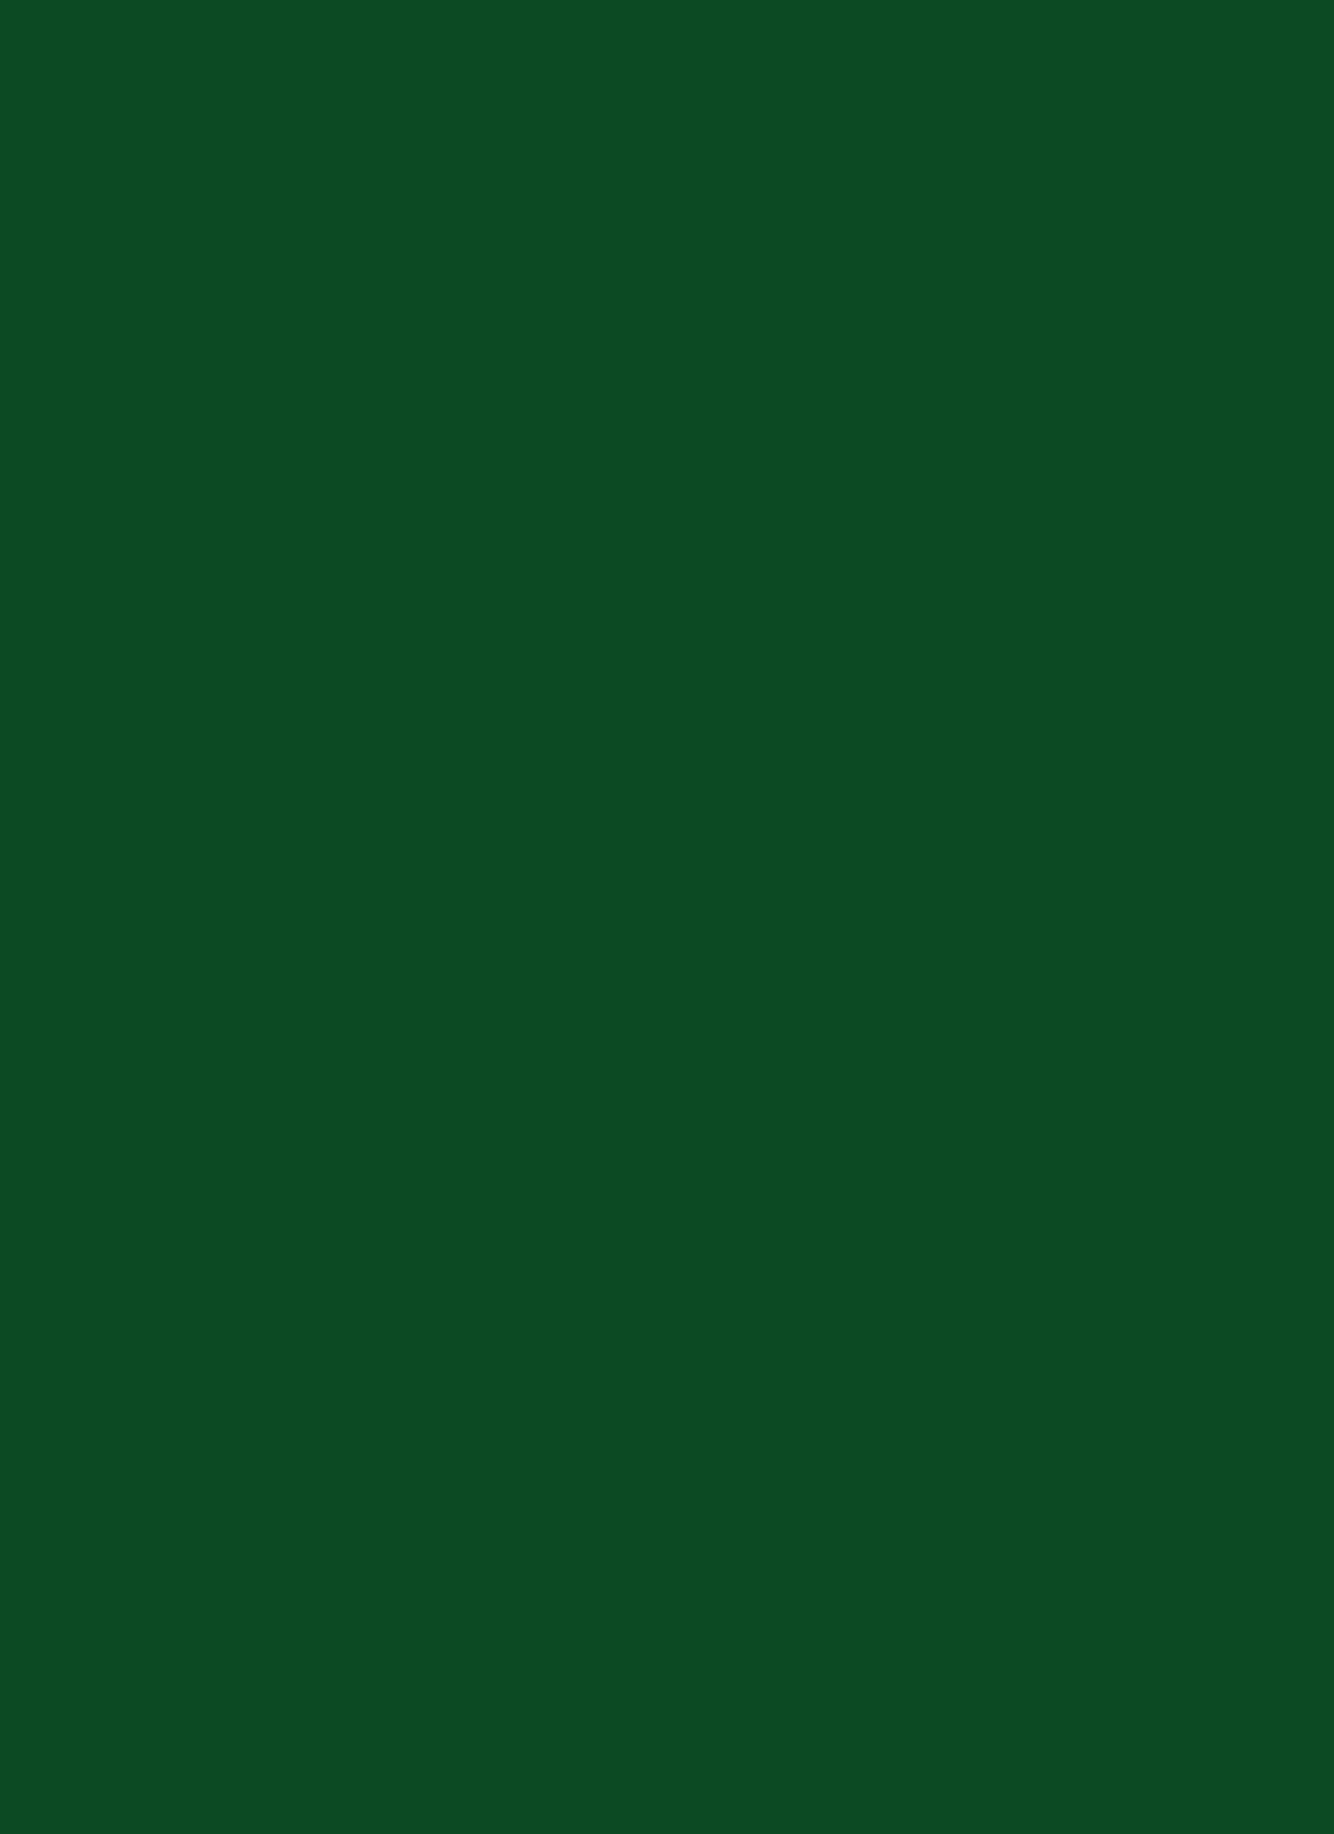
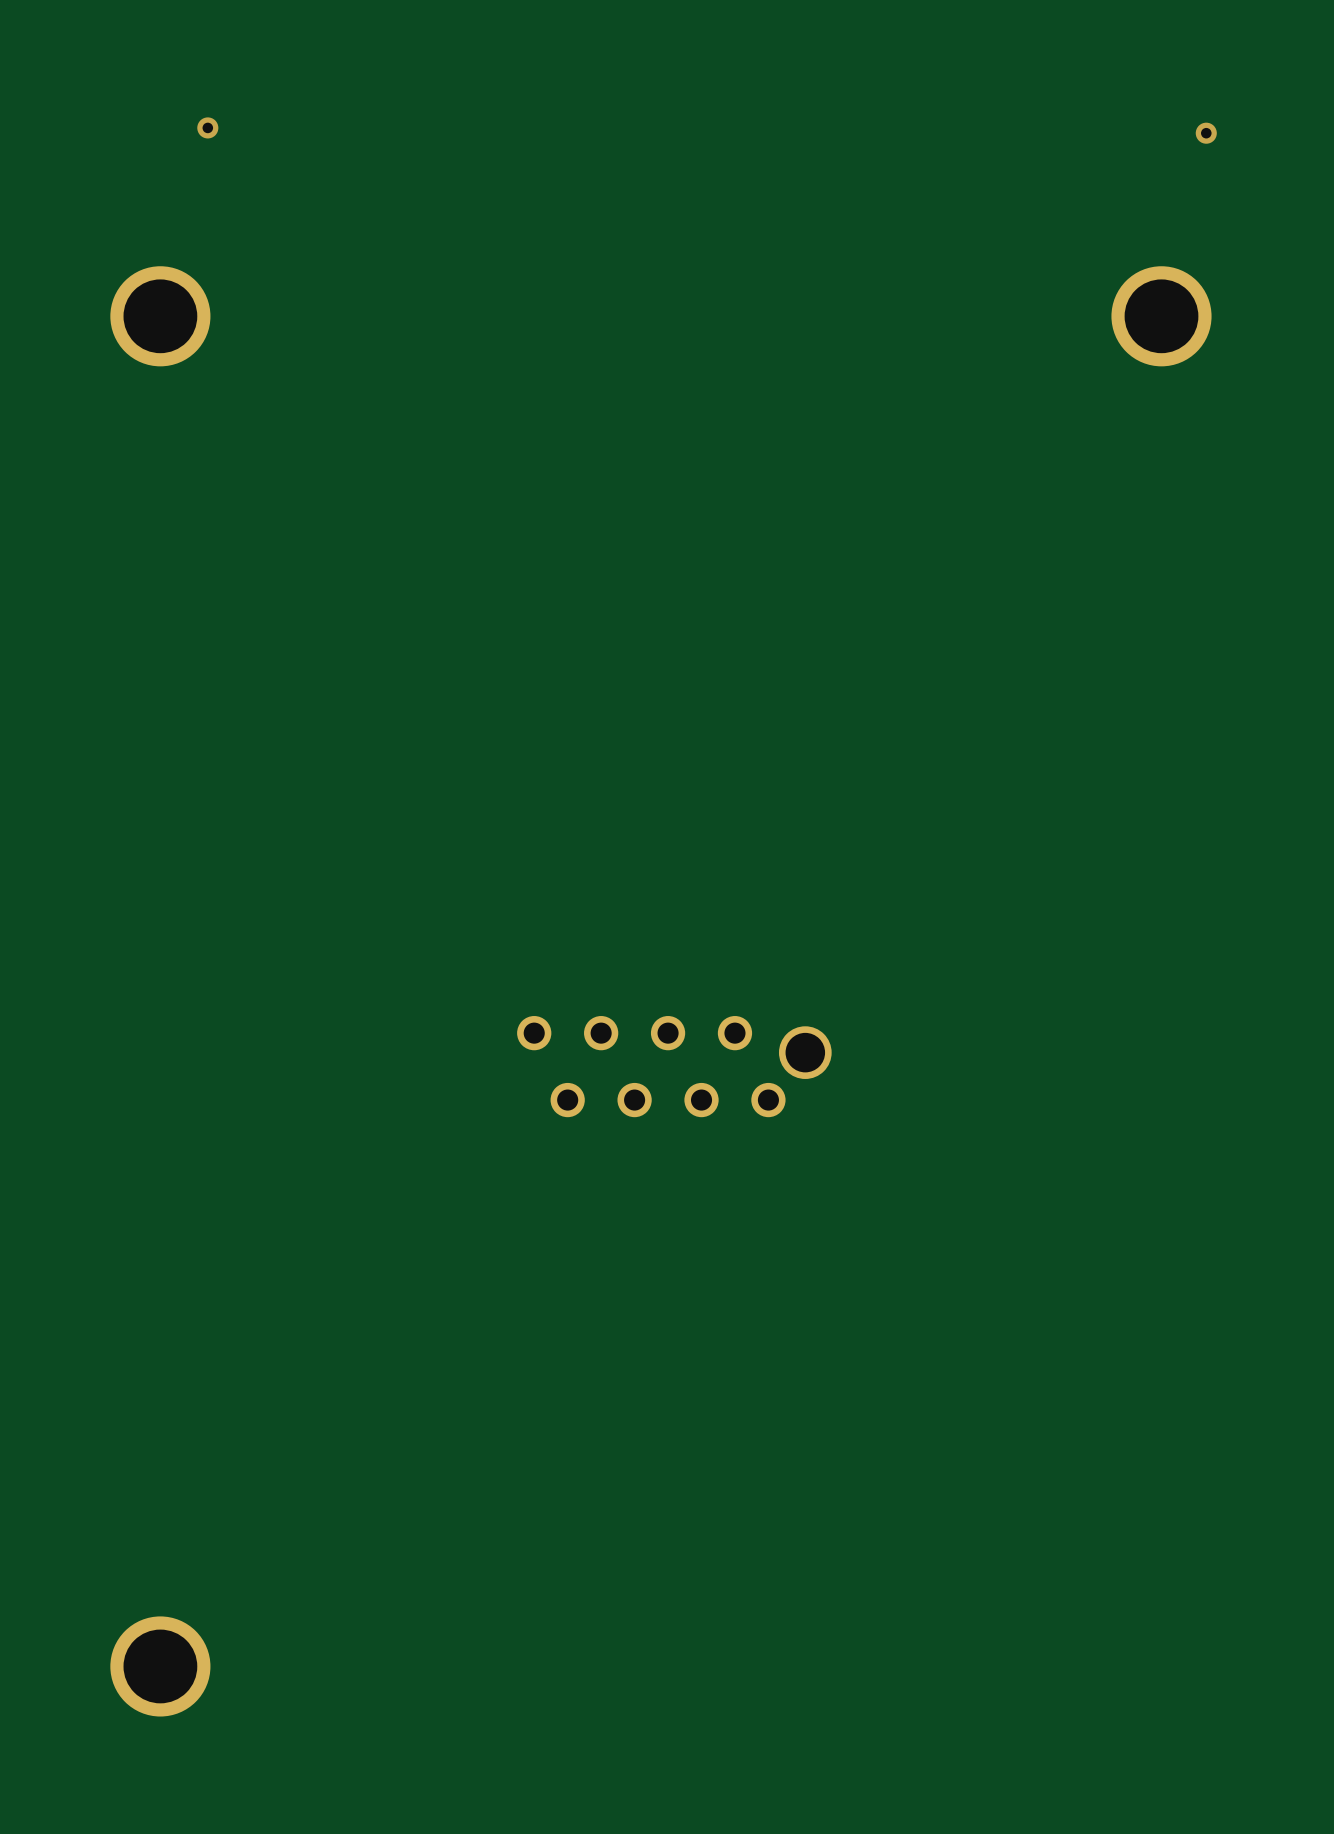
via: none -> (207, 127)
via: none -> (1206, 133)
part: none -> (160, 316)
part: none -> (1161, 316)
part: none -> (674, 1066)
part: none -> (160, 1666)

